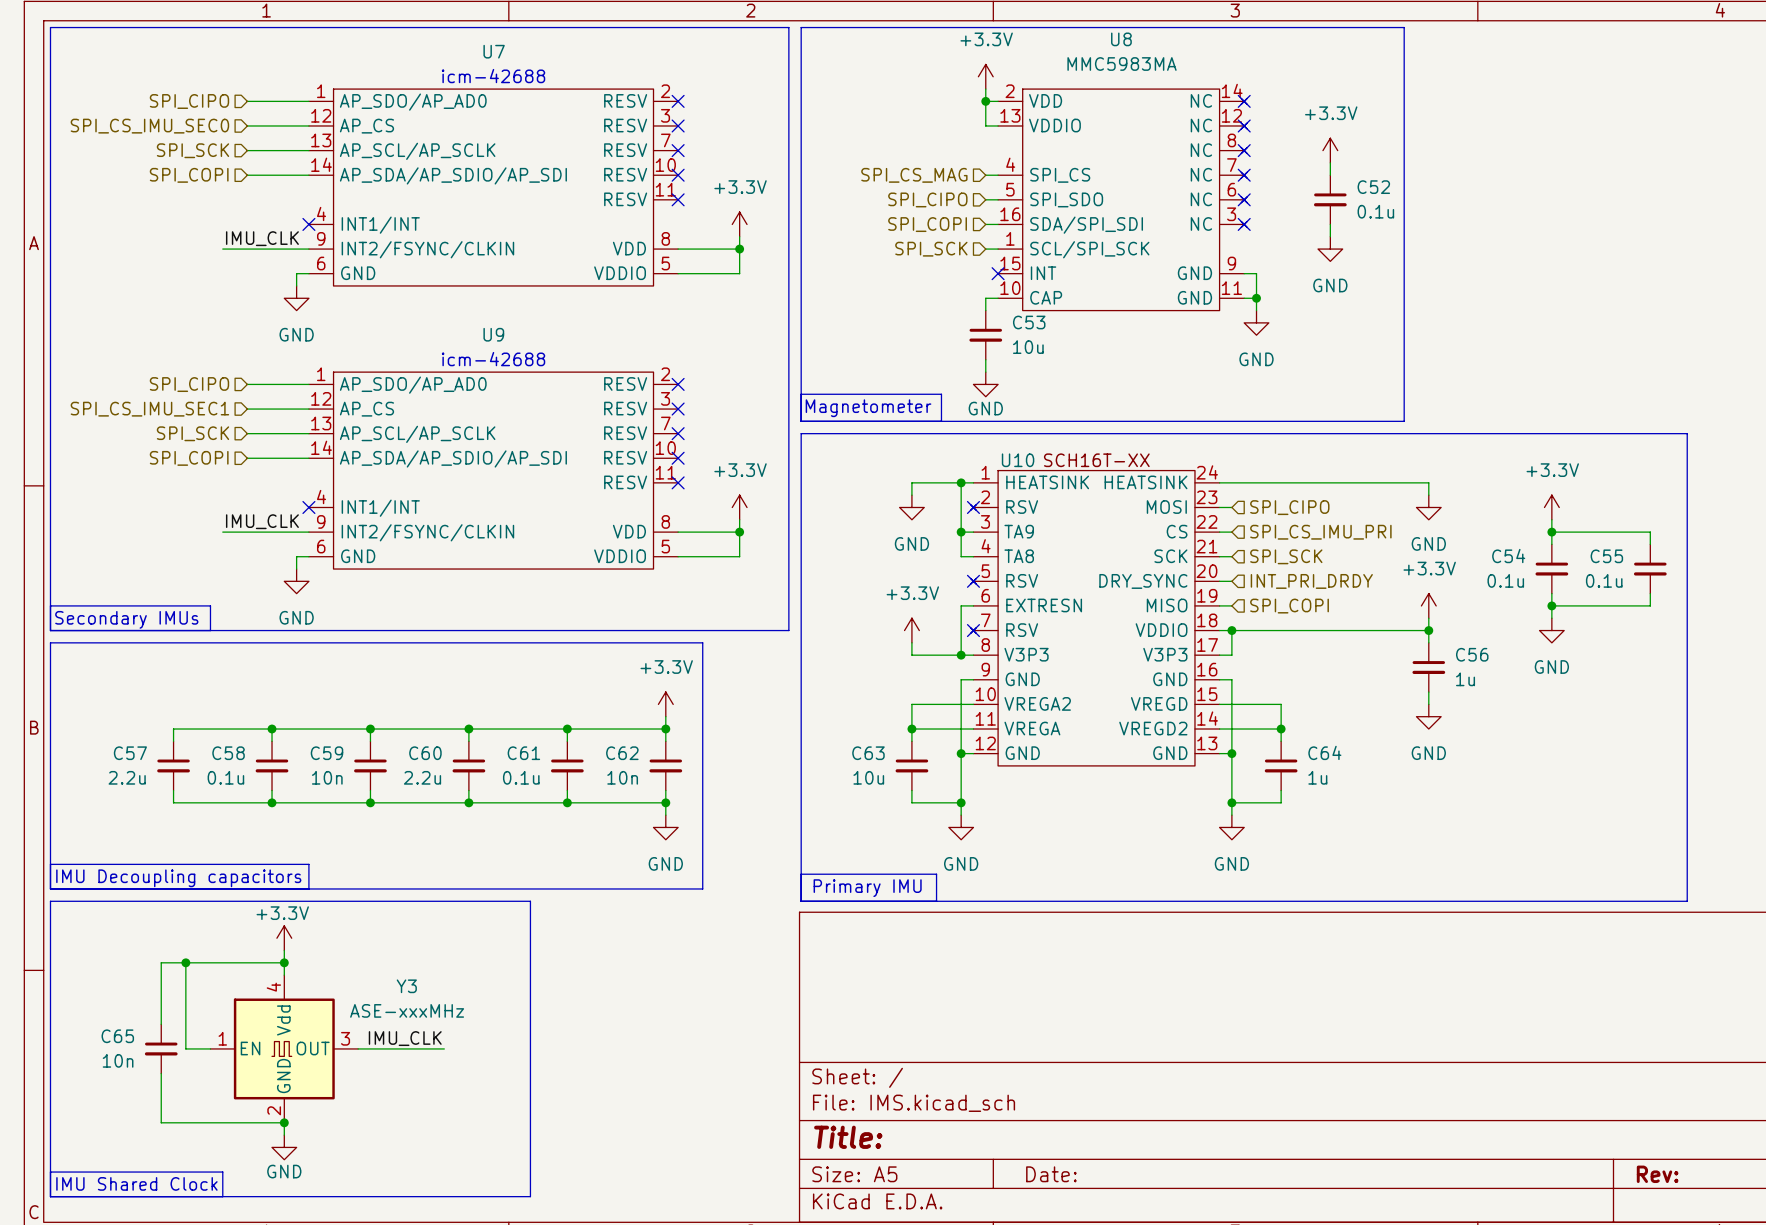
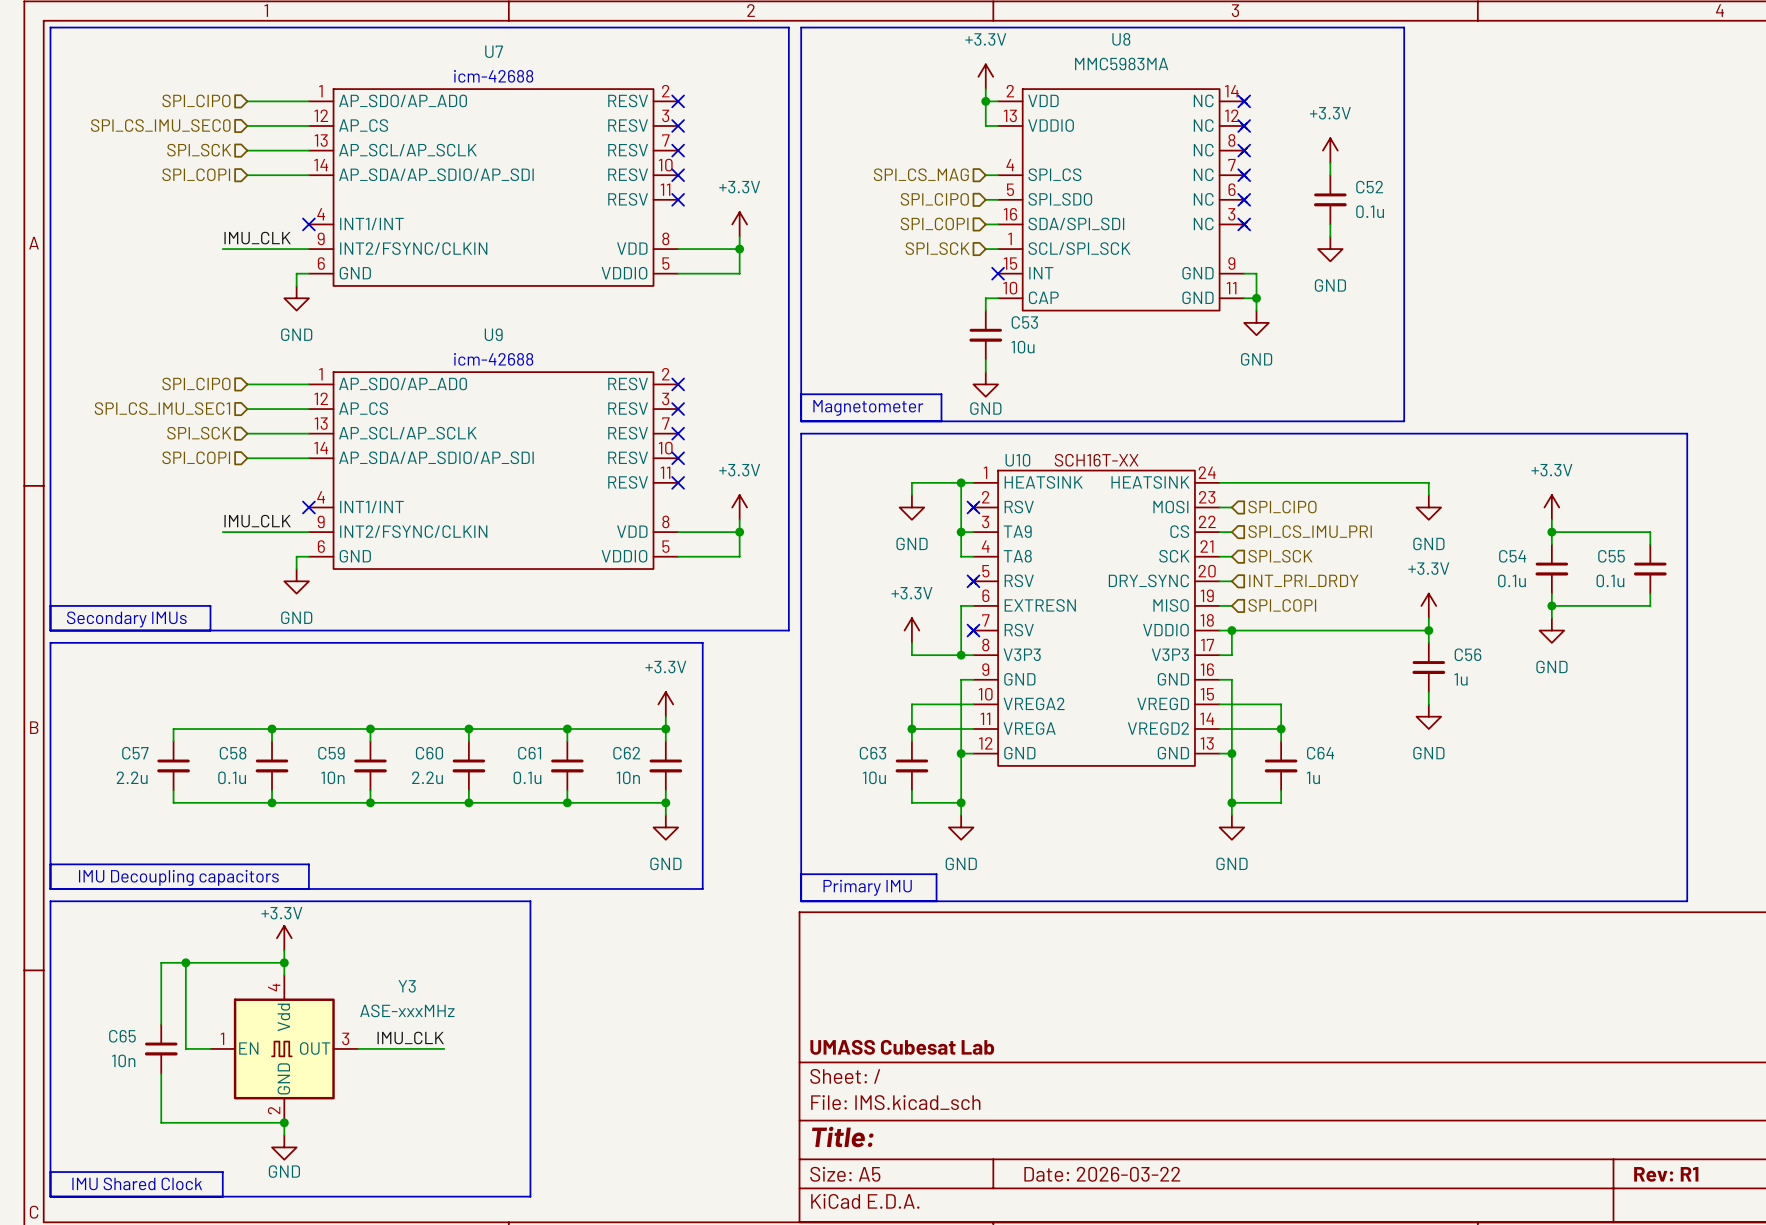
title block: none -> UMASS Cubesat Lab (902, 1047)
title block: Date: (1051, 1174) -> Date: 2026-03-22 (1102, 1174)
title block: Rev: (1657, 1174) -> Rev: R1 (1666, 1174)

